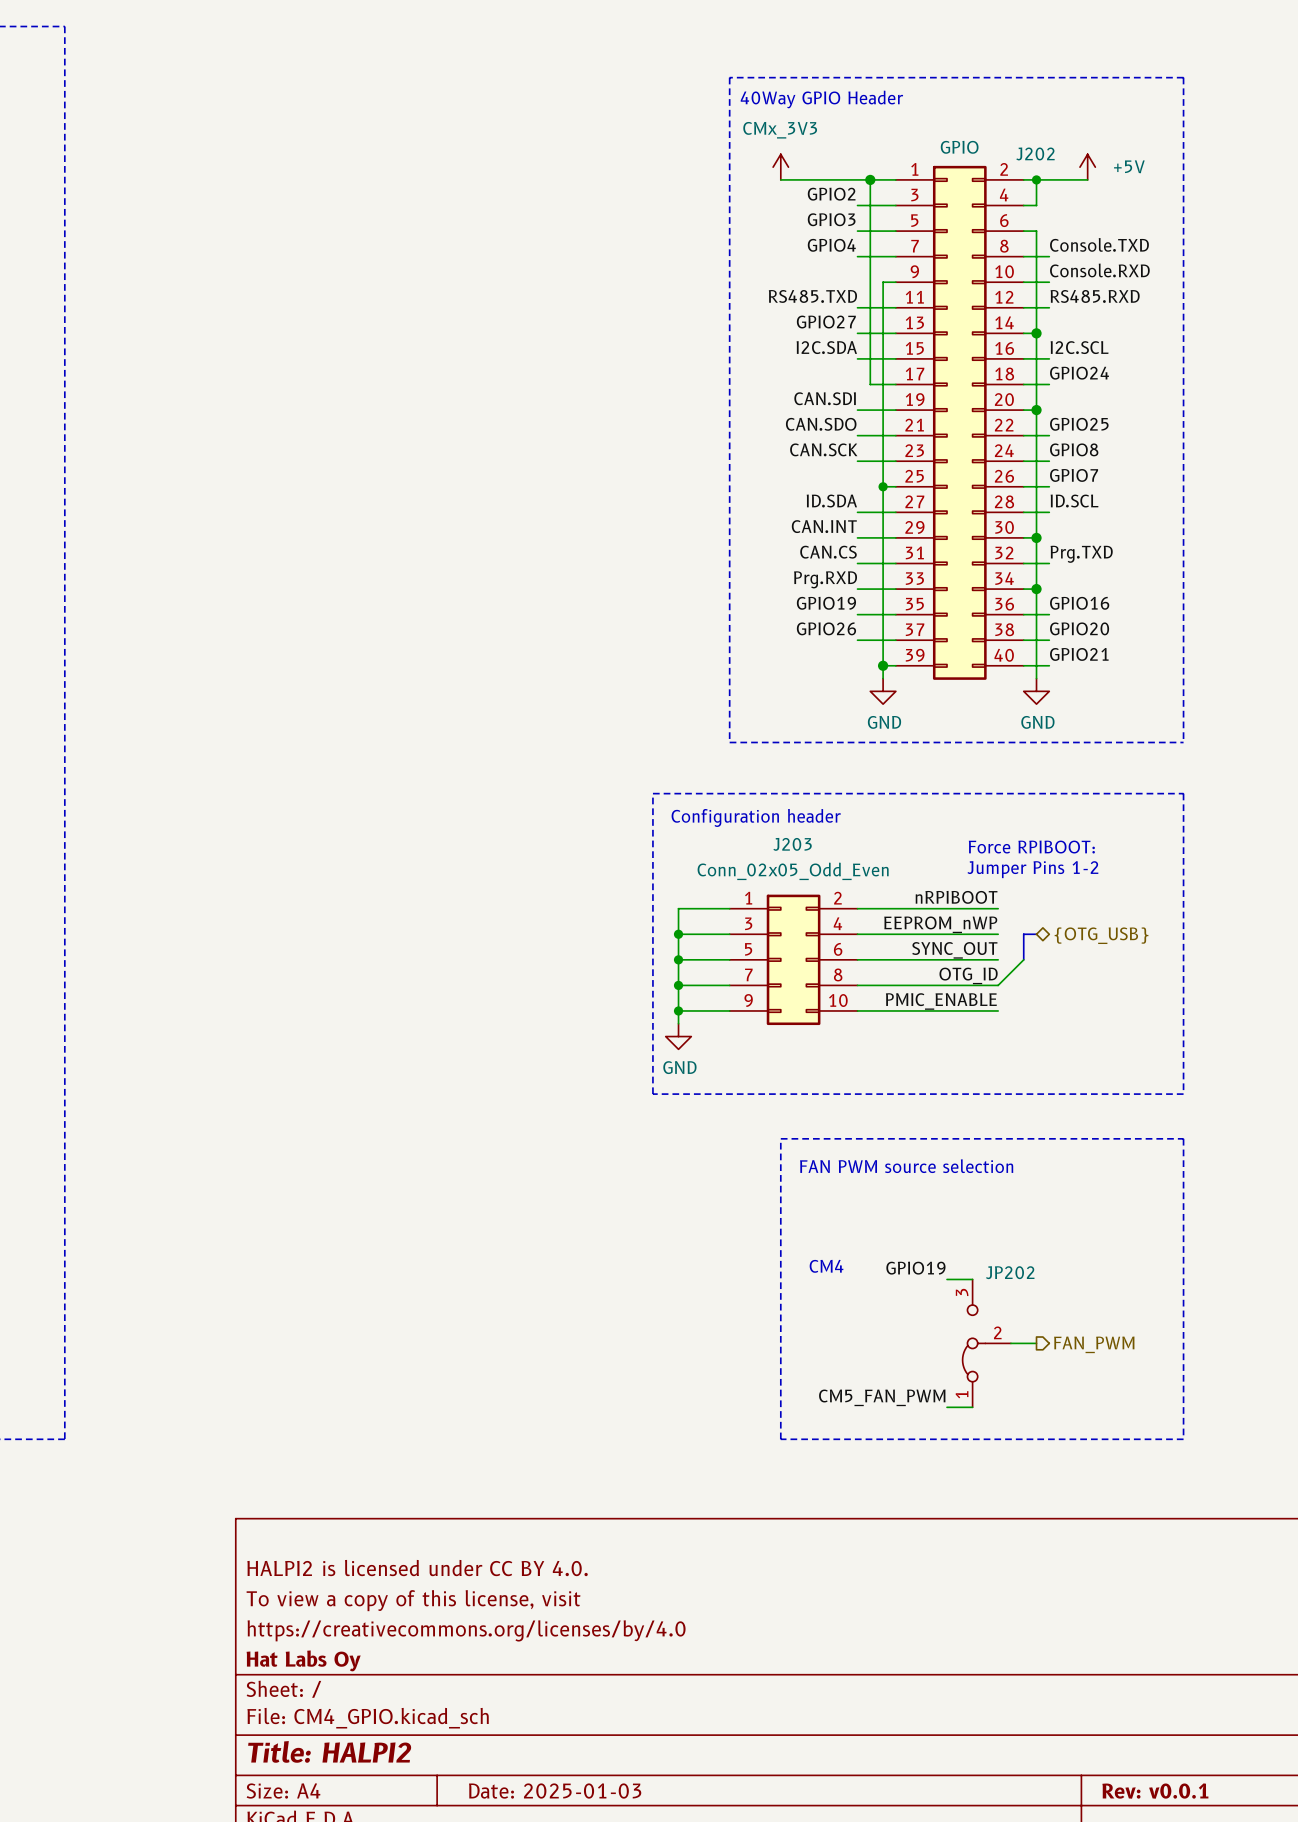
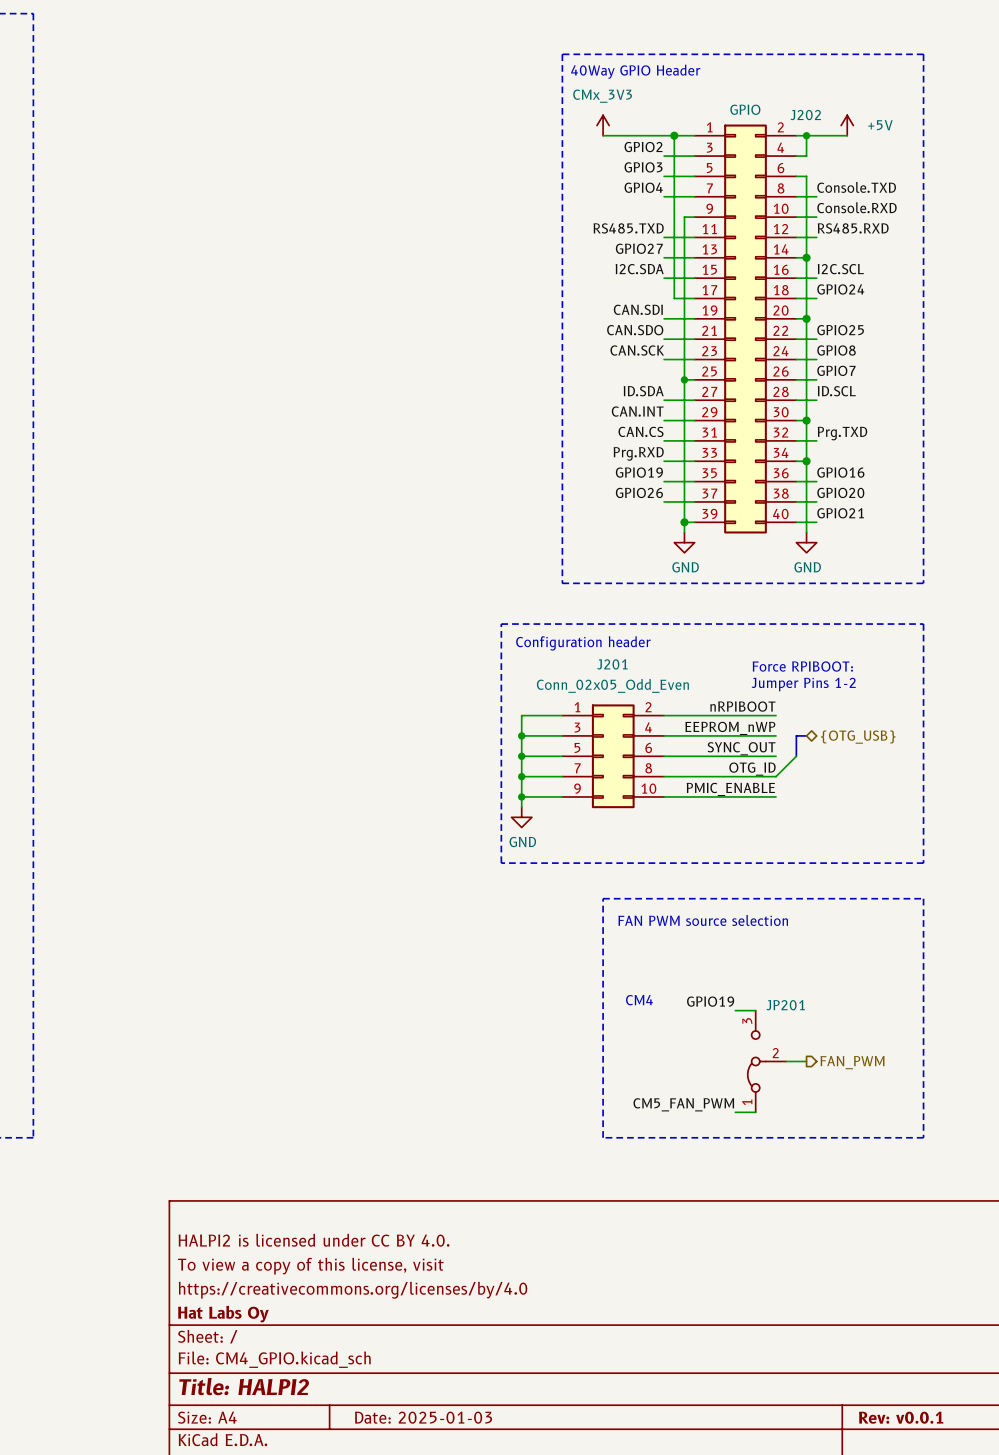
J203 name: J203 (792, 844) -> J201 (612, 664)
JP202 name: JP202 (1010, 1272) -> JP201 (785, 1005)

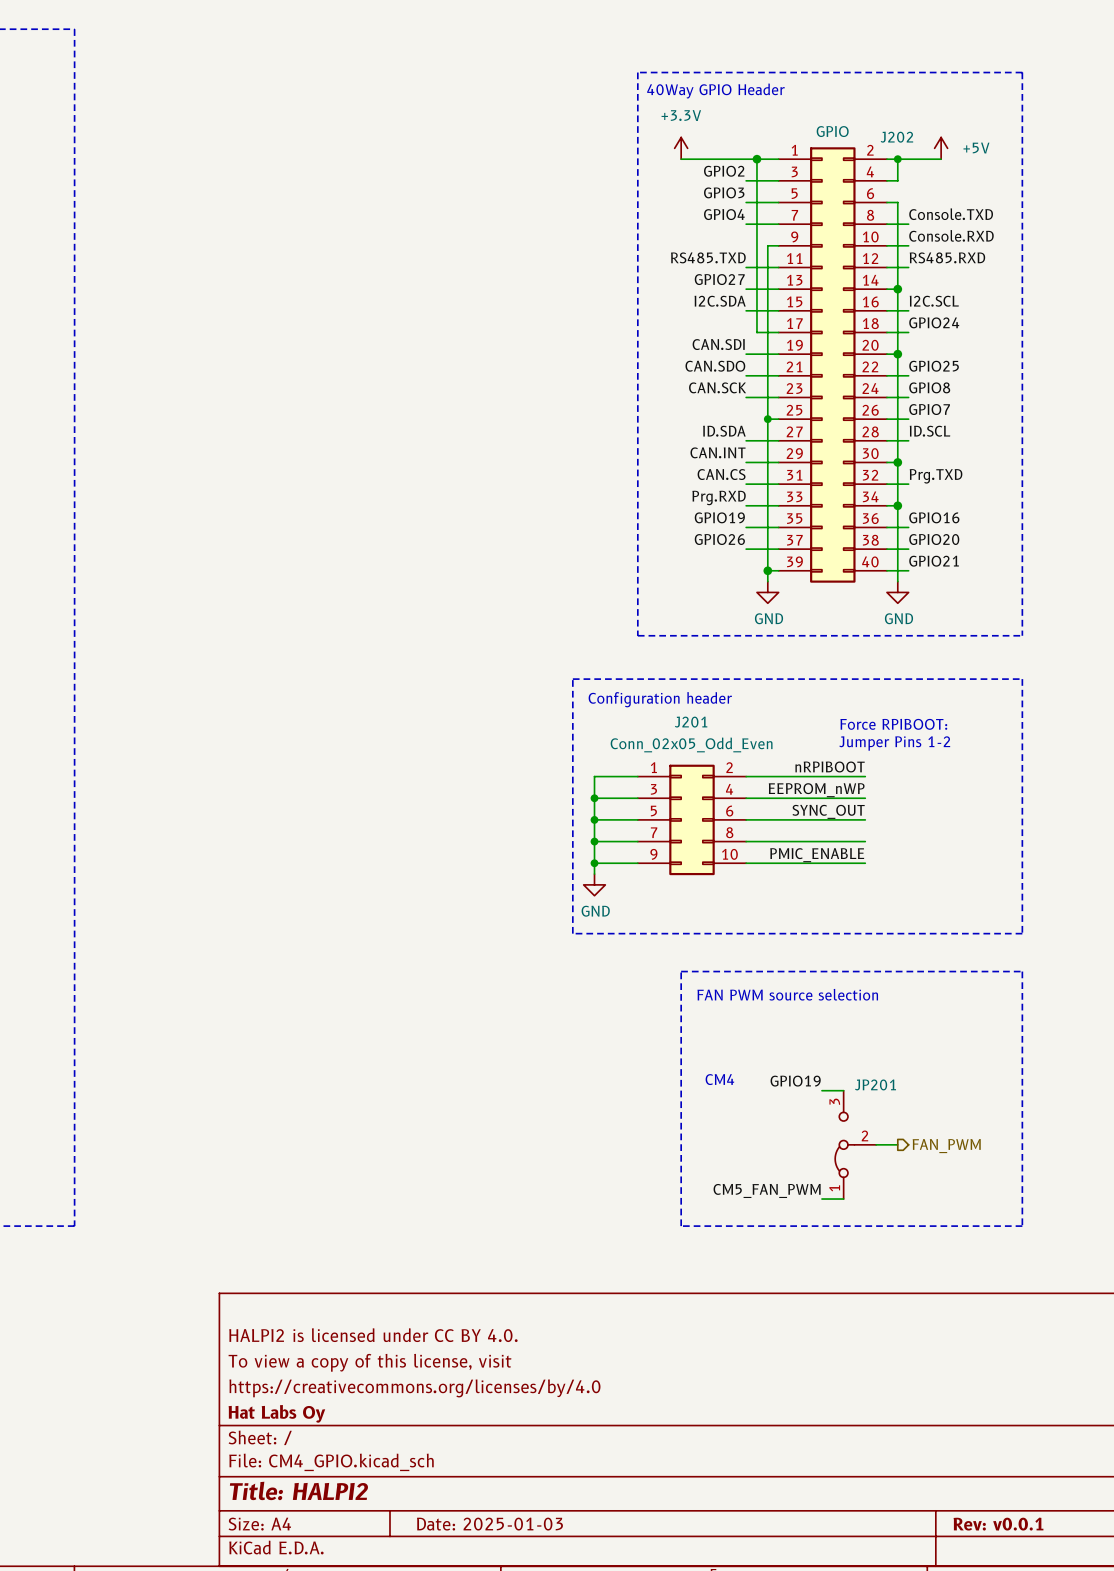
power symbol: CMx_3V3 (603, 125) -> +3.3V (681, 148)
bus: (806, 735) (796, 735) (796, 756) -> none
hierarchical label: {OTG_USB} (858, 737) -> none
wire: (796, 756) (776, 776) -> none
label: OTG_ID (752, 769) -> none

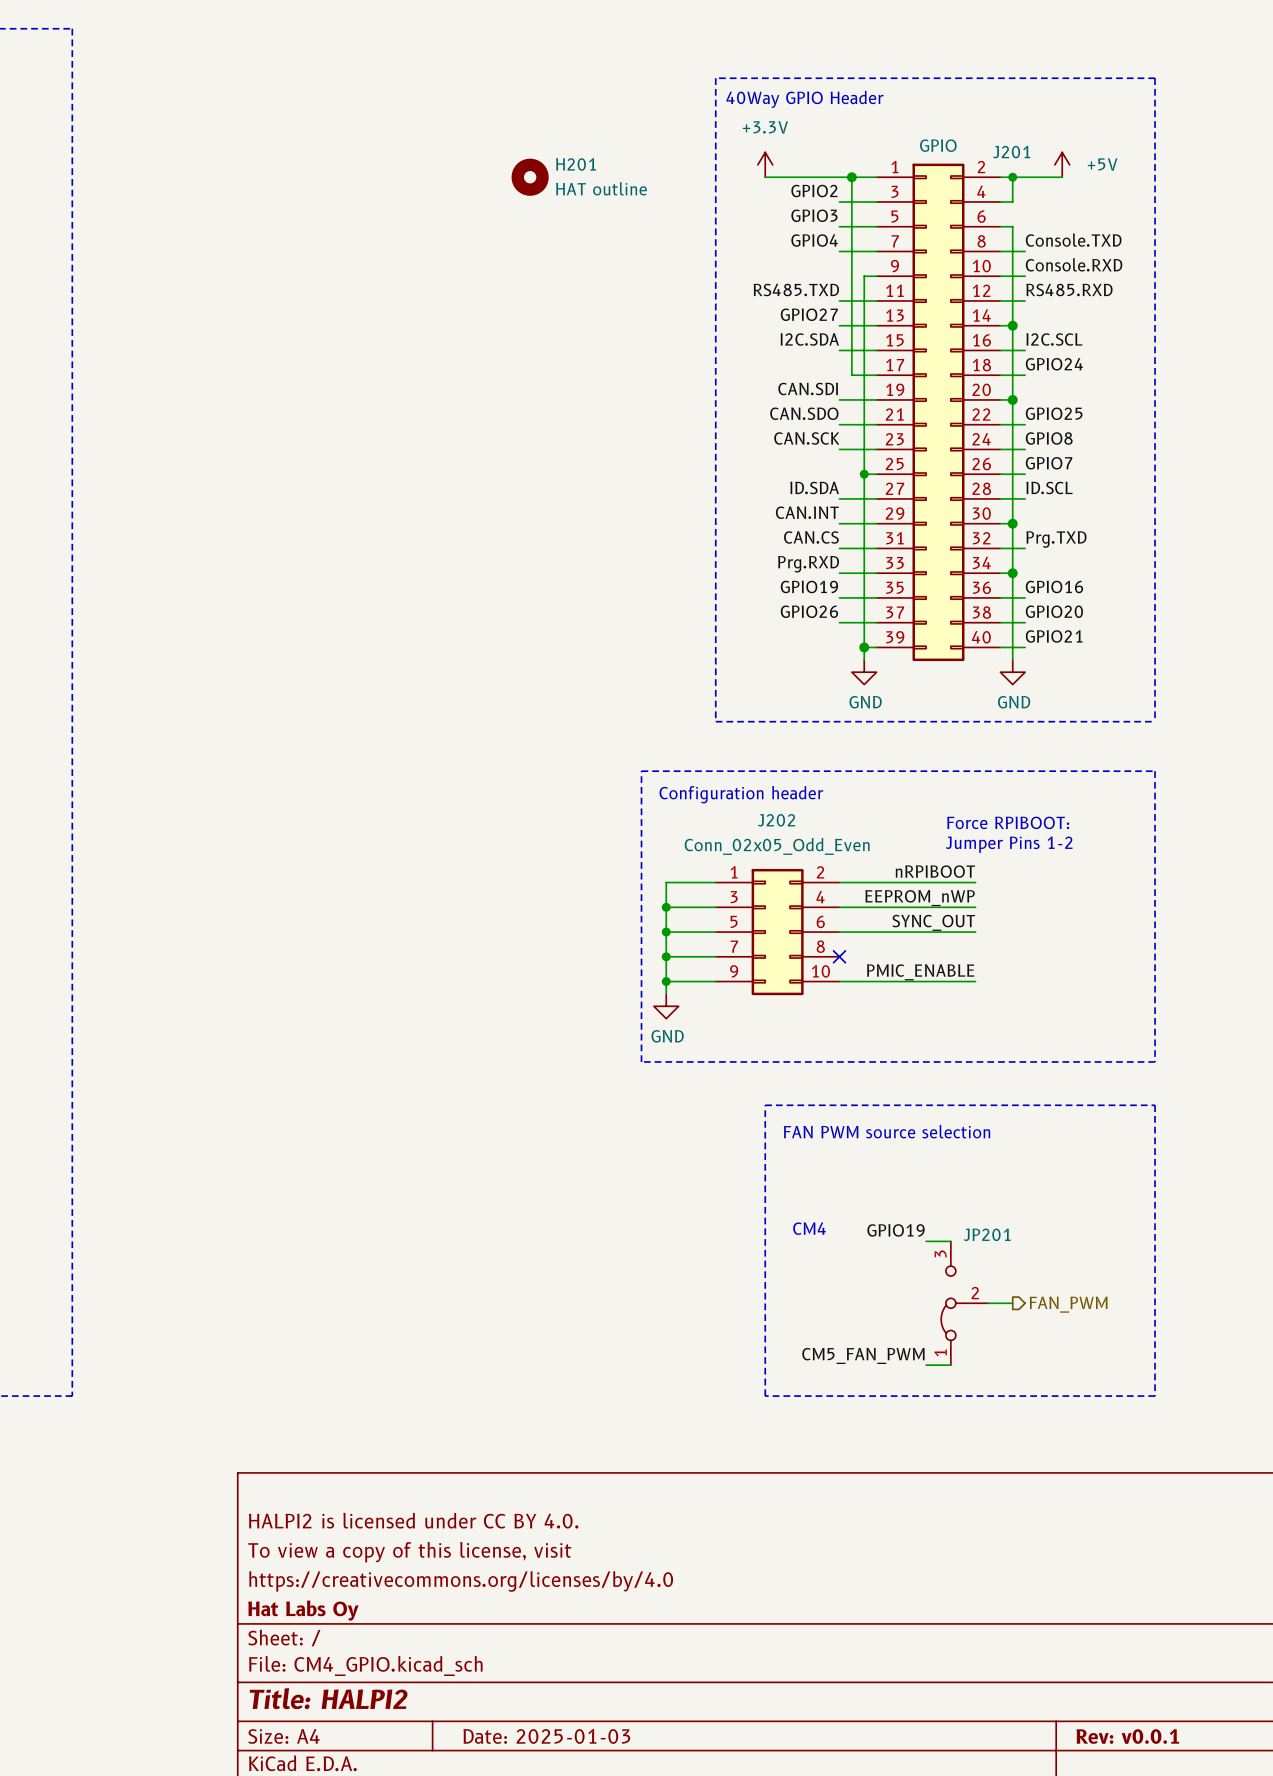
J202 name: J202 (896, 137) -> J201 (1011, 152)
H201: none -> HAT outline (530, 177)
J201 name: J201 (691, 722) -> J202 (776, 820)
wire: (746, 841) (865, 841) -> none
no-connect mark: none -> (839, 956)

